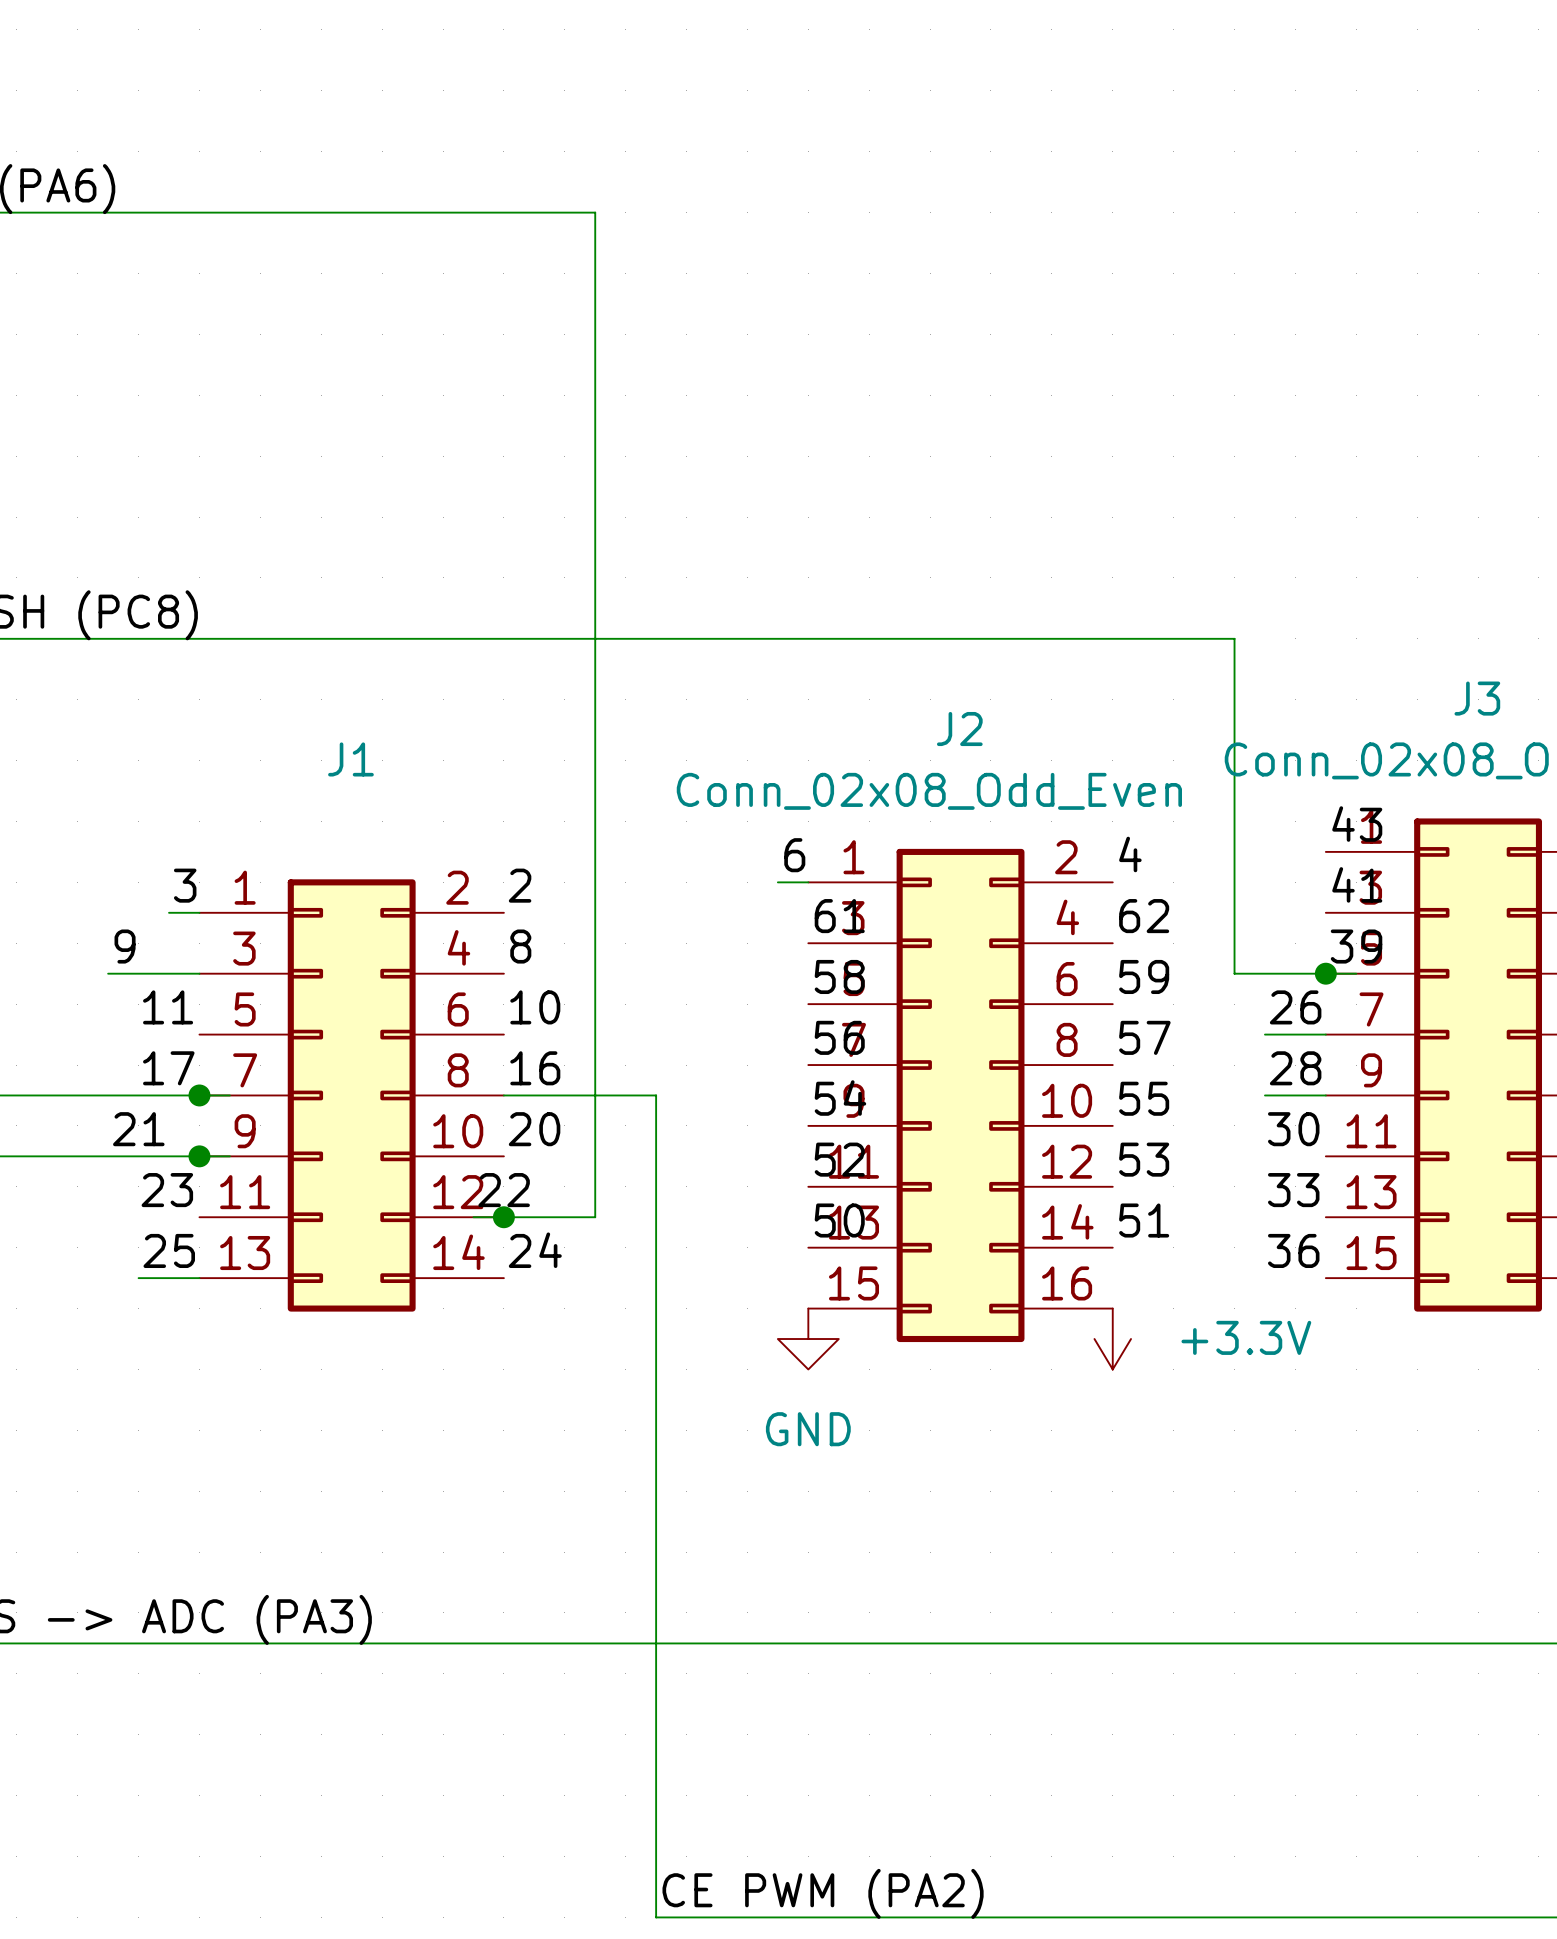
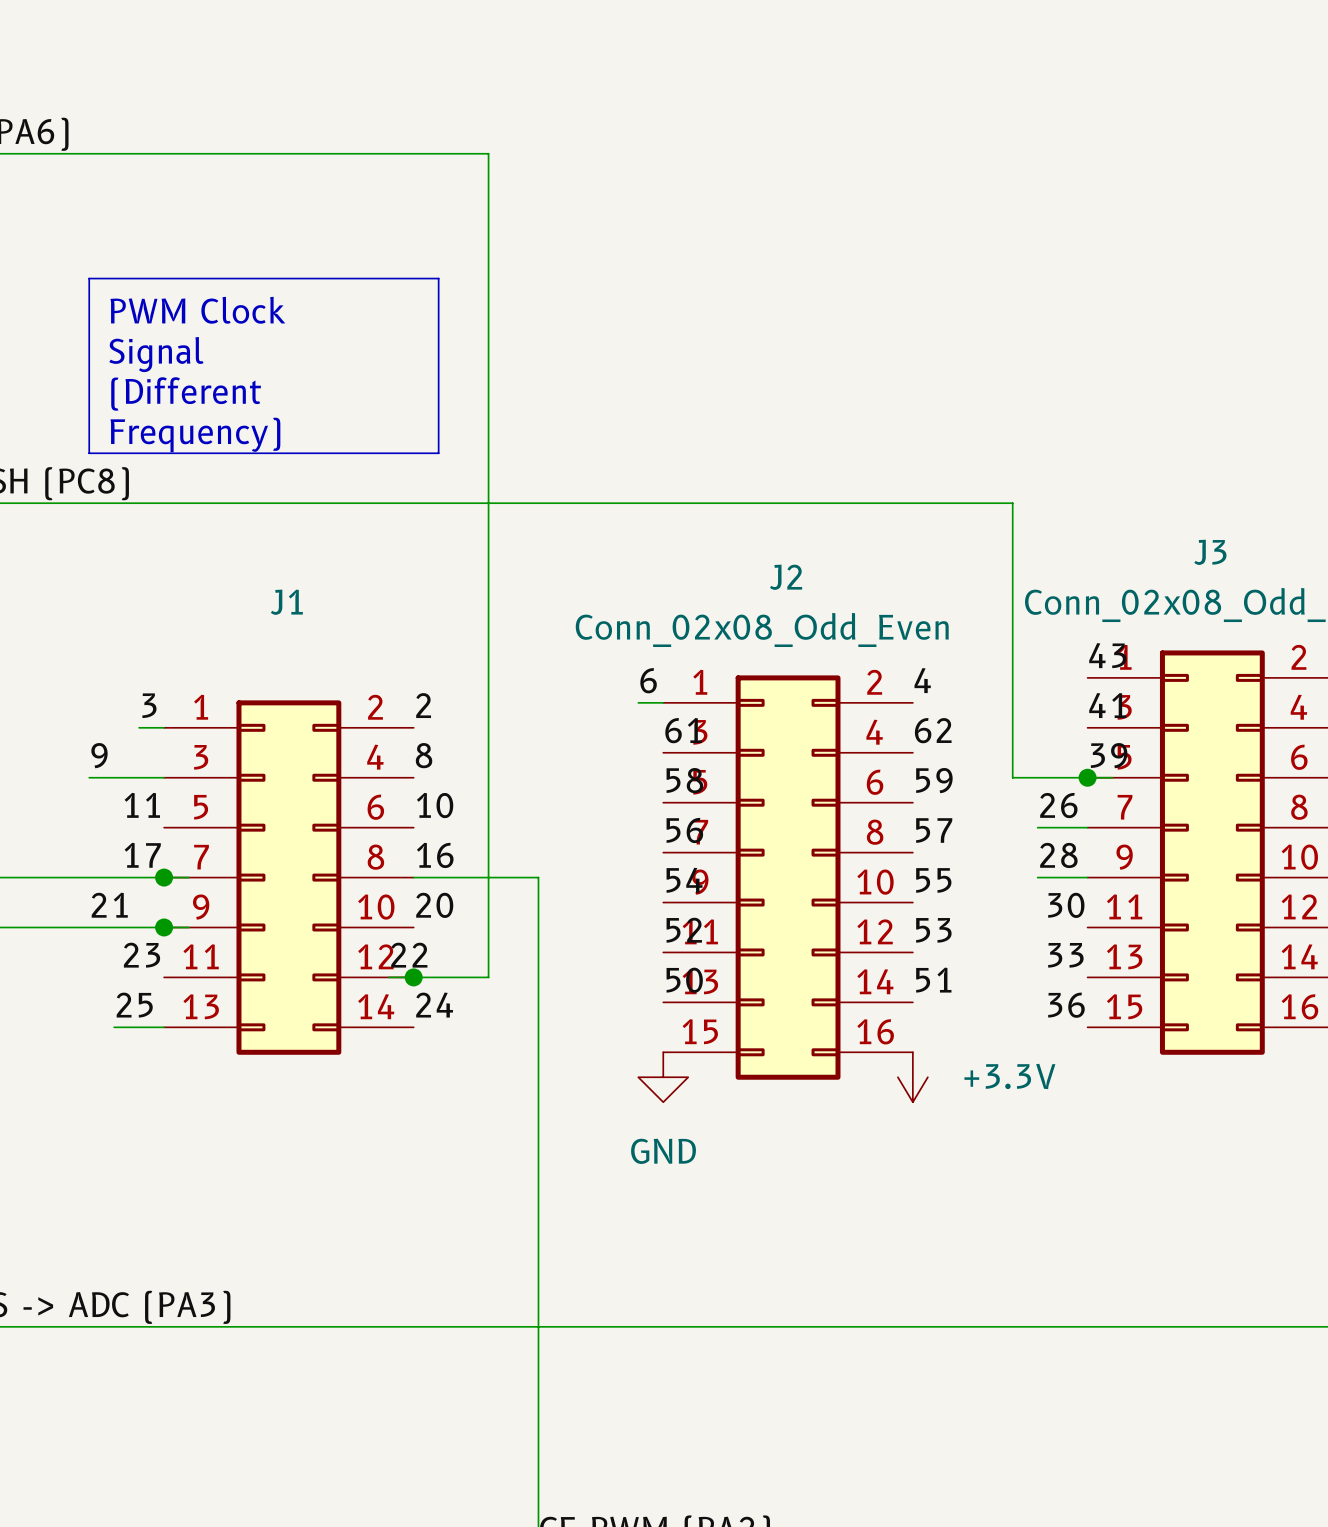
line: none -> (89, 278) (438, 278) (438, 453) (89, 453) (89, 278)
text: none -> PWM Clock (197, 310)
text: none -> Signal (156, 354)
text: none -> (Different (186, 393)
text: none -> Frequency) (195, 434)

